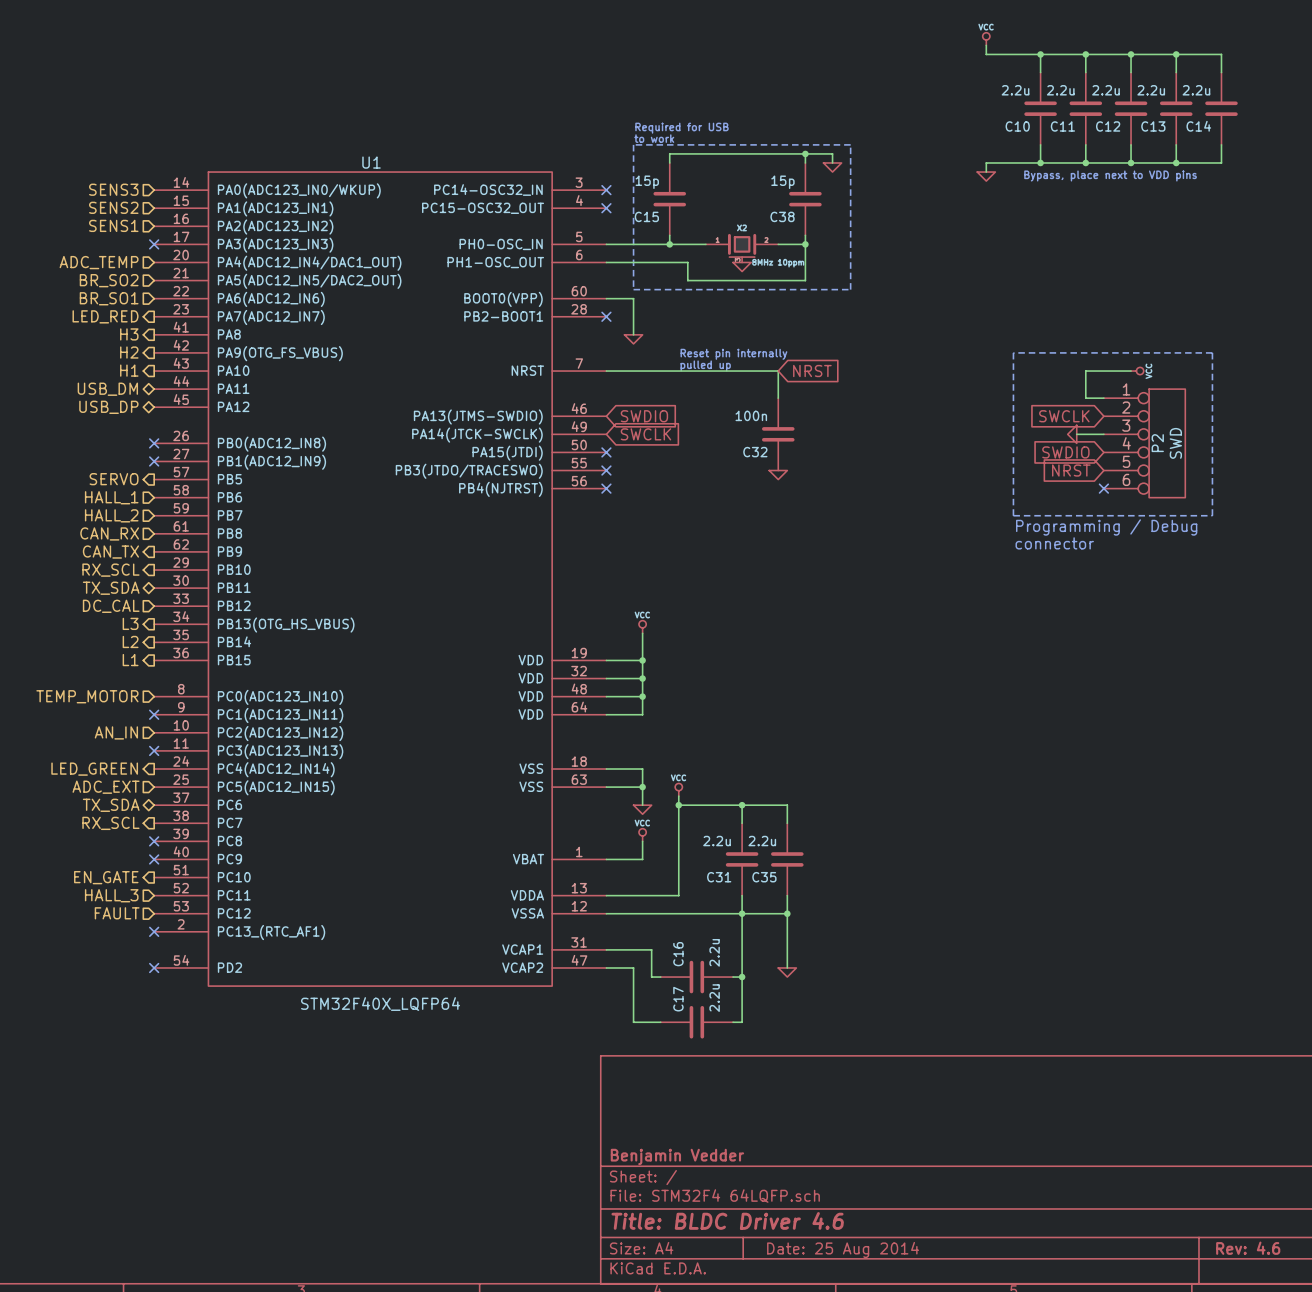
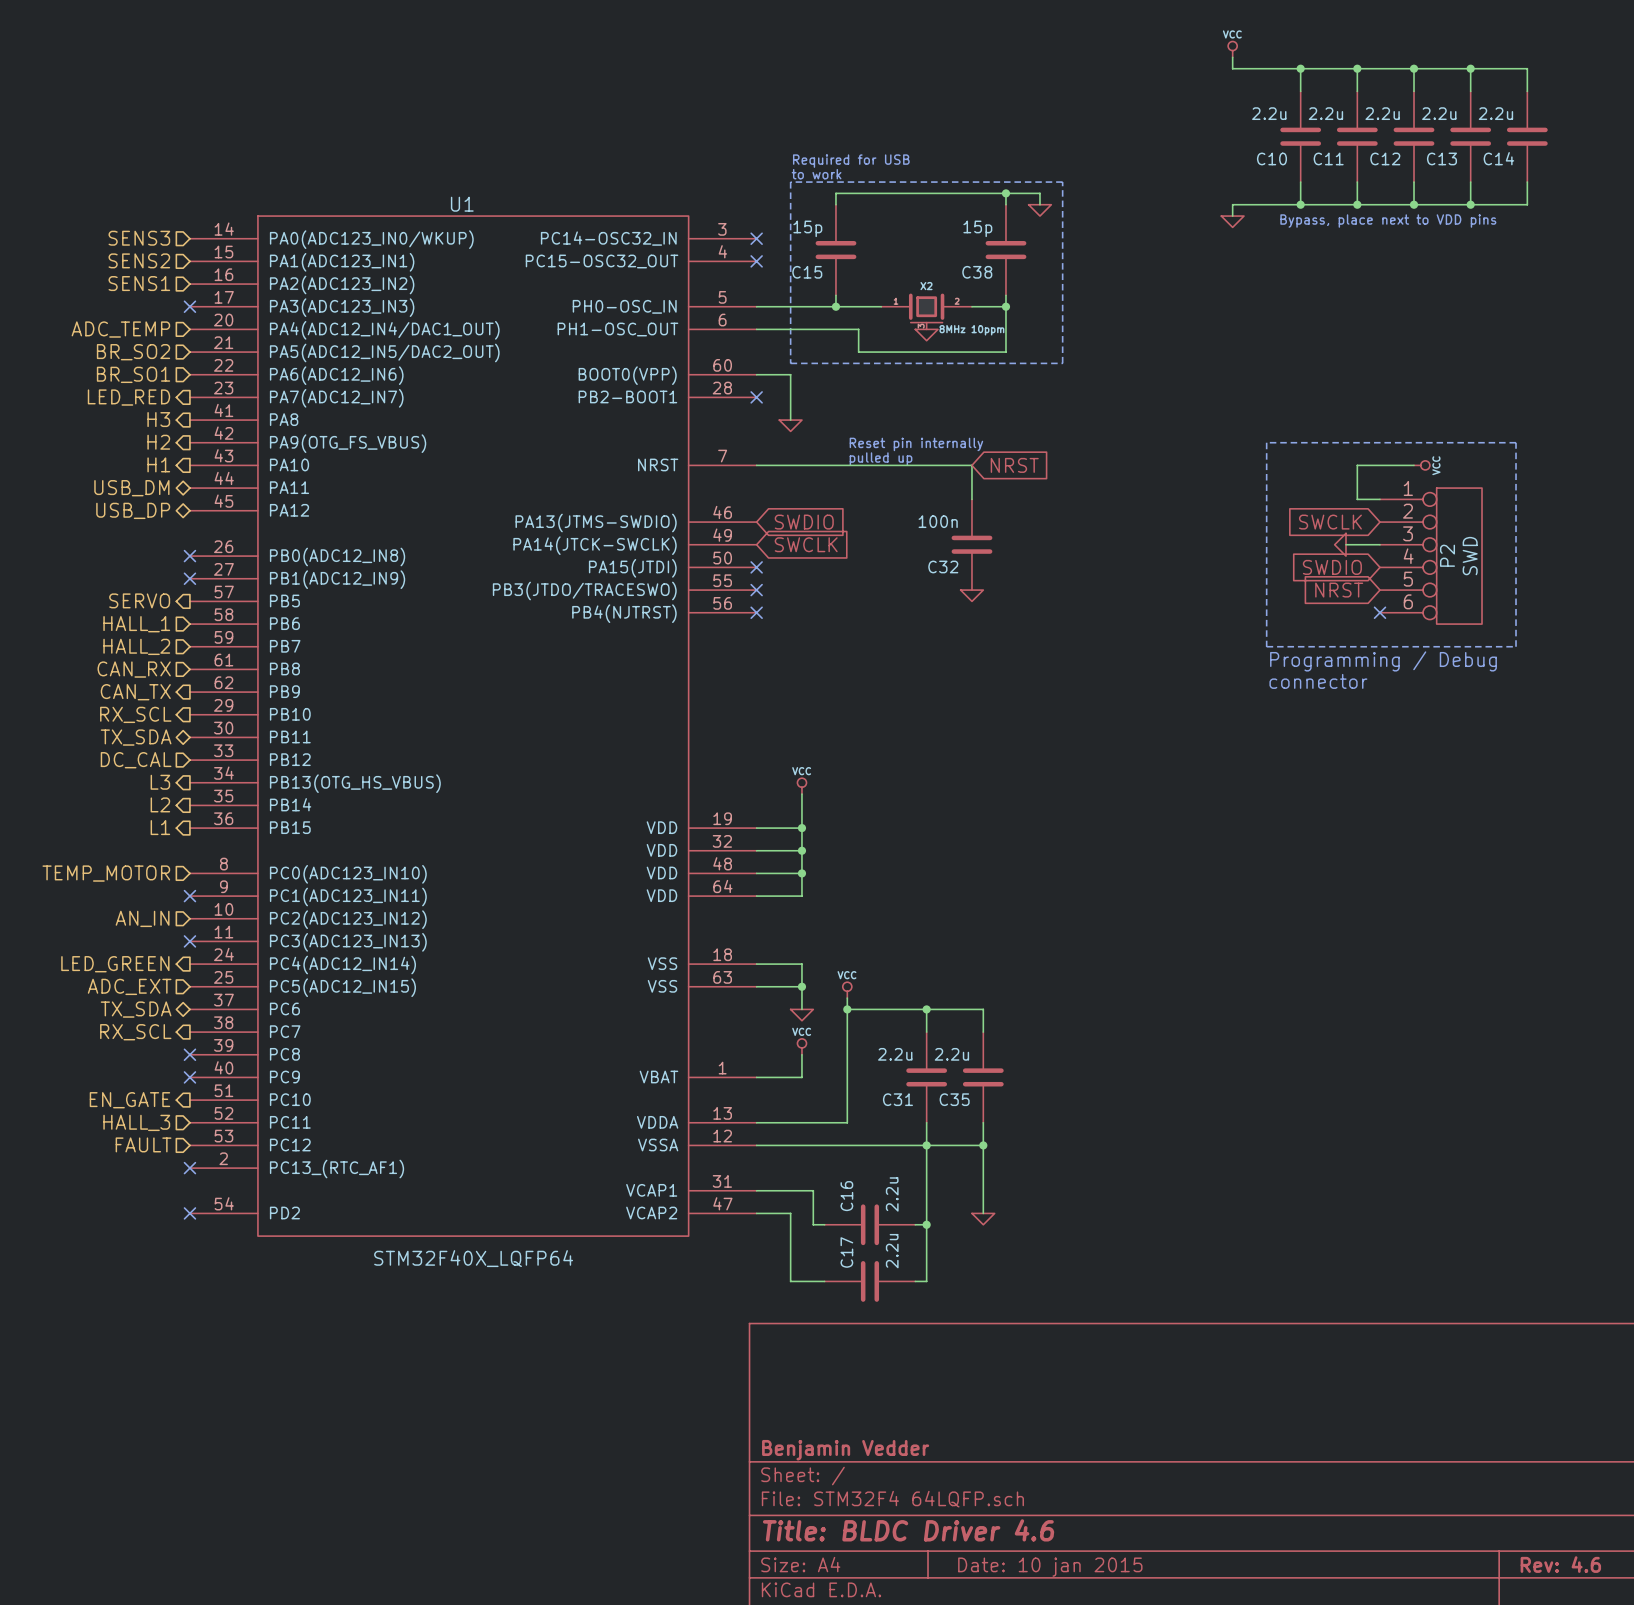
title block: Date: 25 Aug 2014 (843, 1249) -> Date: 10 jan 2015 (1050, 1567)

